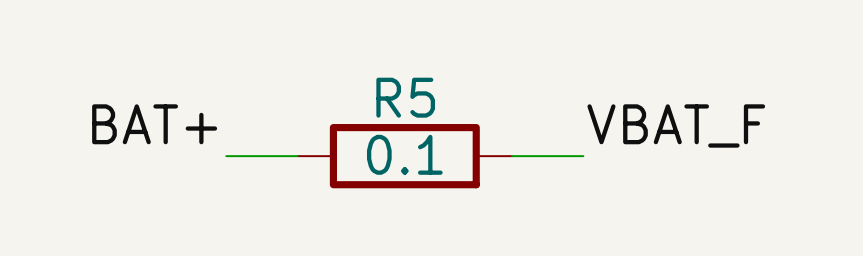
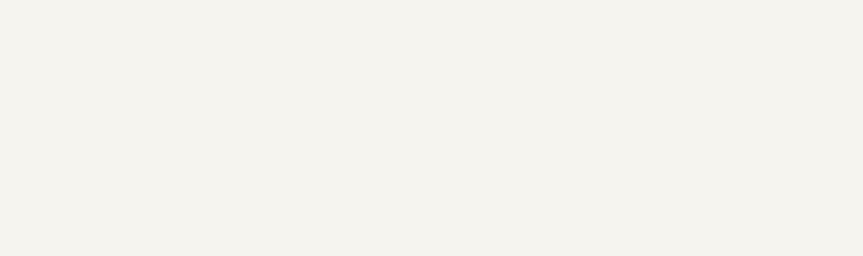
label: BAT+ (154, 124) -> none
label: VBAT_F (676, 125) -> none
wire: (226, 156) (297, 156) -> none
R5: 0.1 (404, 156) -> none
wire: (511, 156) (583, 156) -> none

